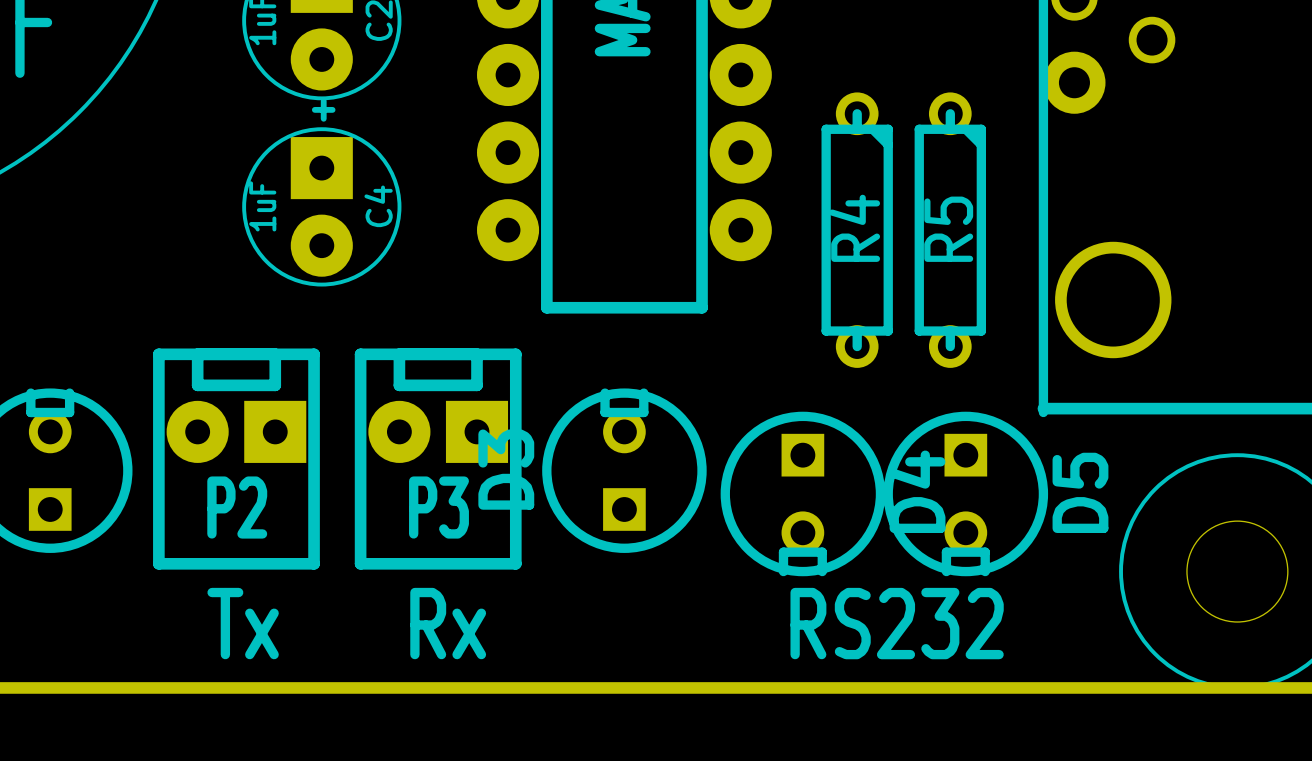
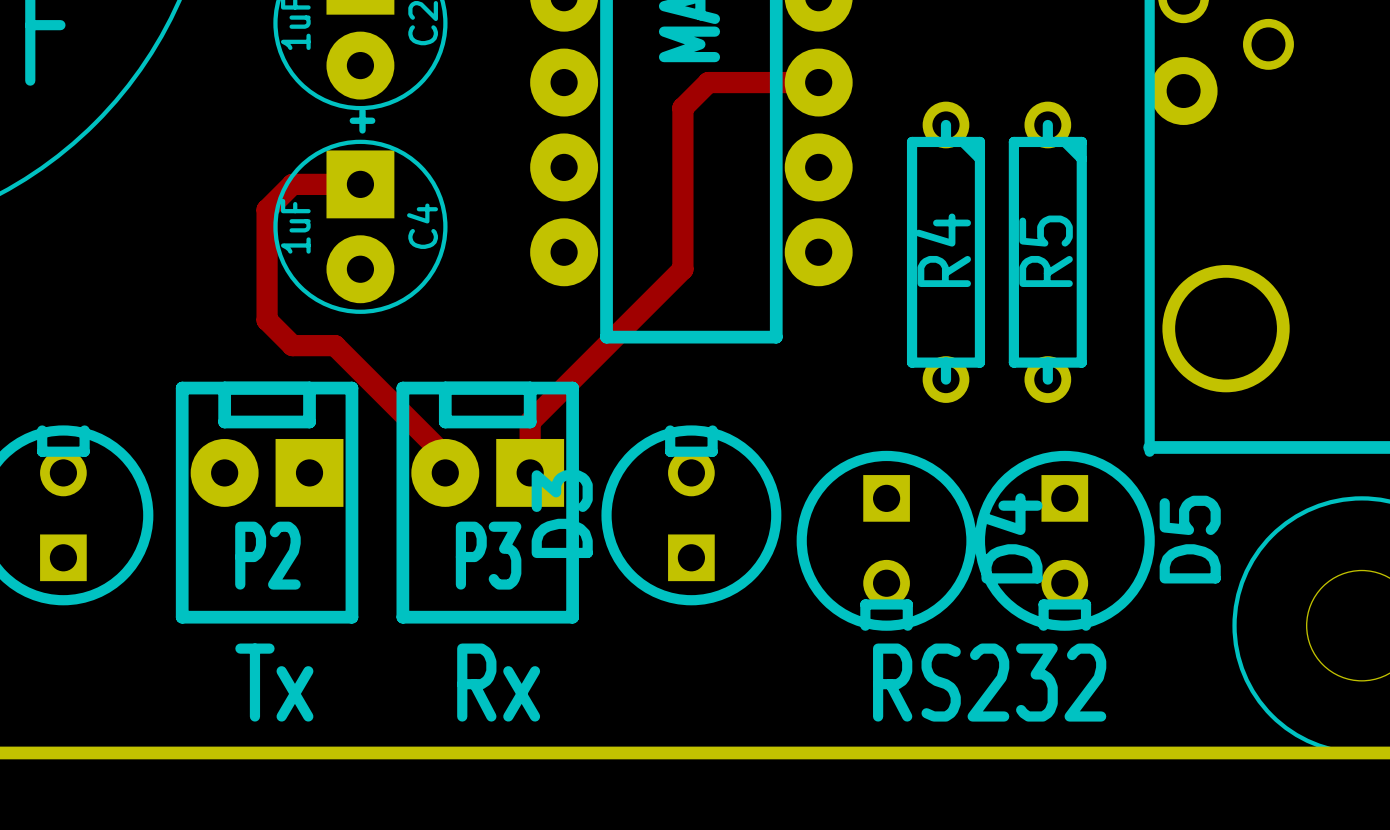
track: none -> (818, 82) (708, 82) (682, 108) (682, 269) (530, 422) (530, 472)
track: none -> (360, 184) (292, 184) (267, 209) (267, 320) (292, 345) (334, 345) (445, 455) (445, 472)

